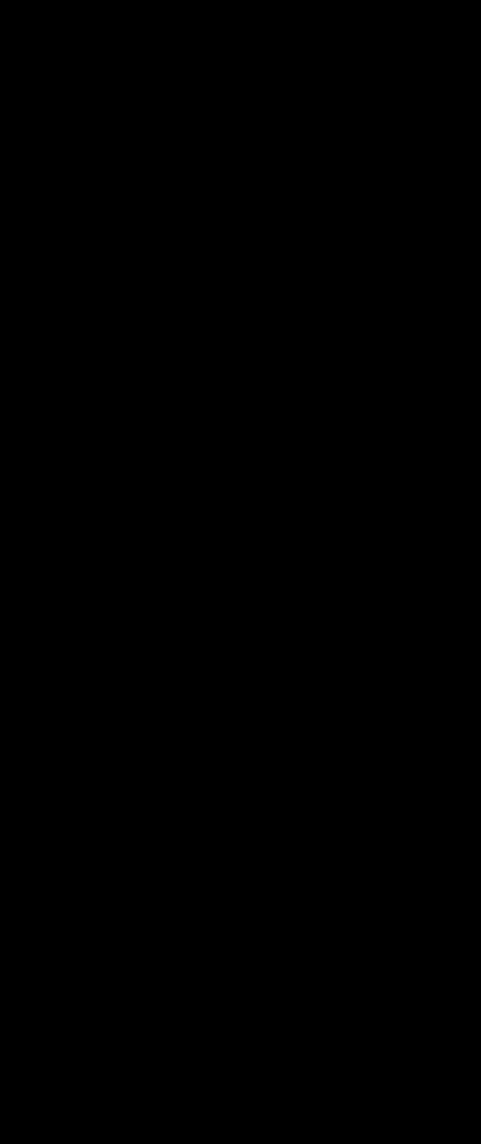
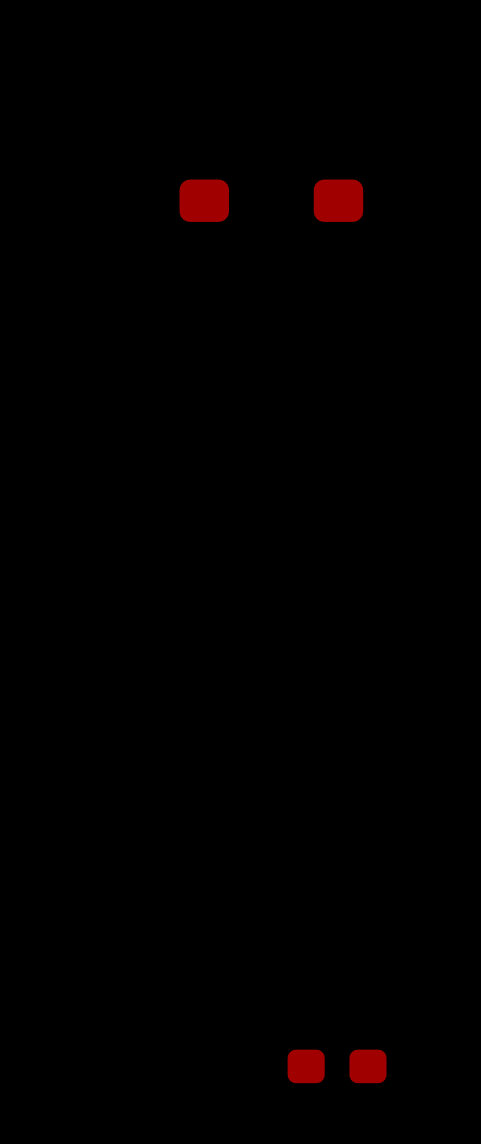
part: none -> (271, 200)
part: none -> (337, 1066)

